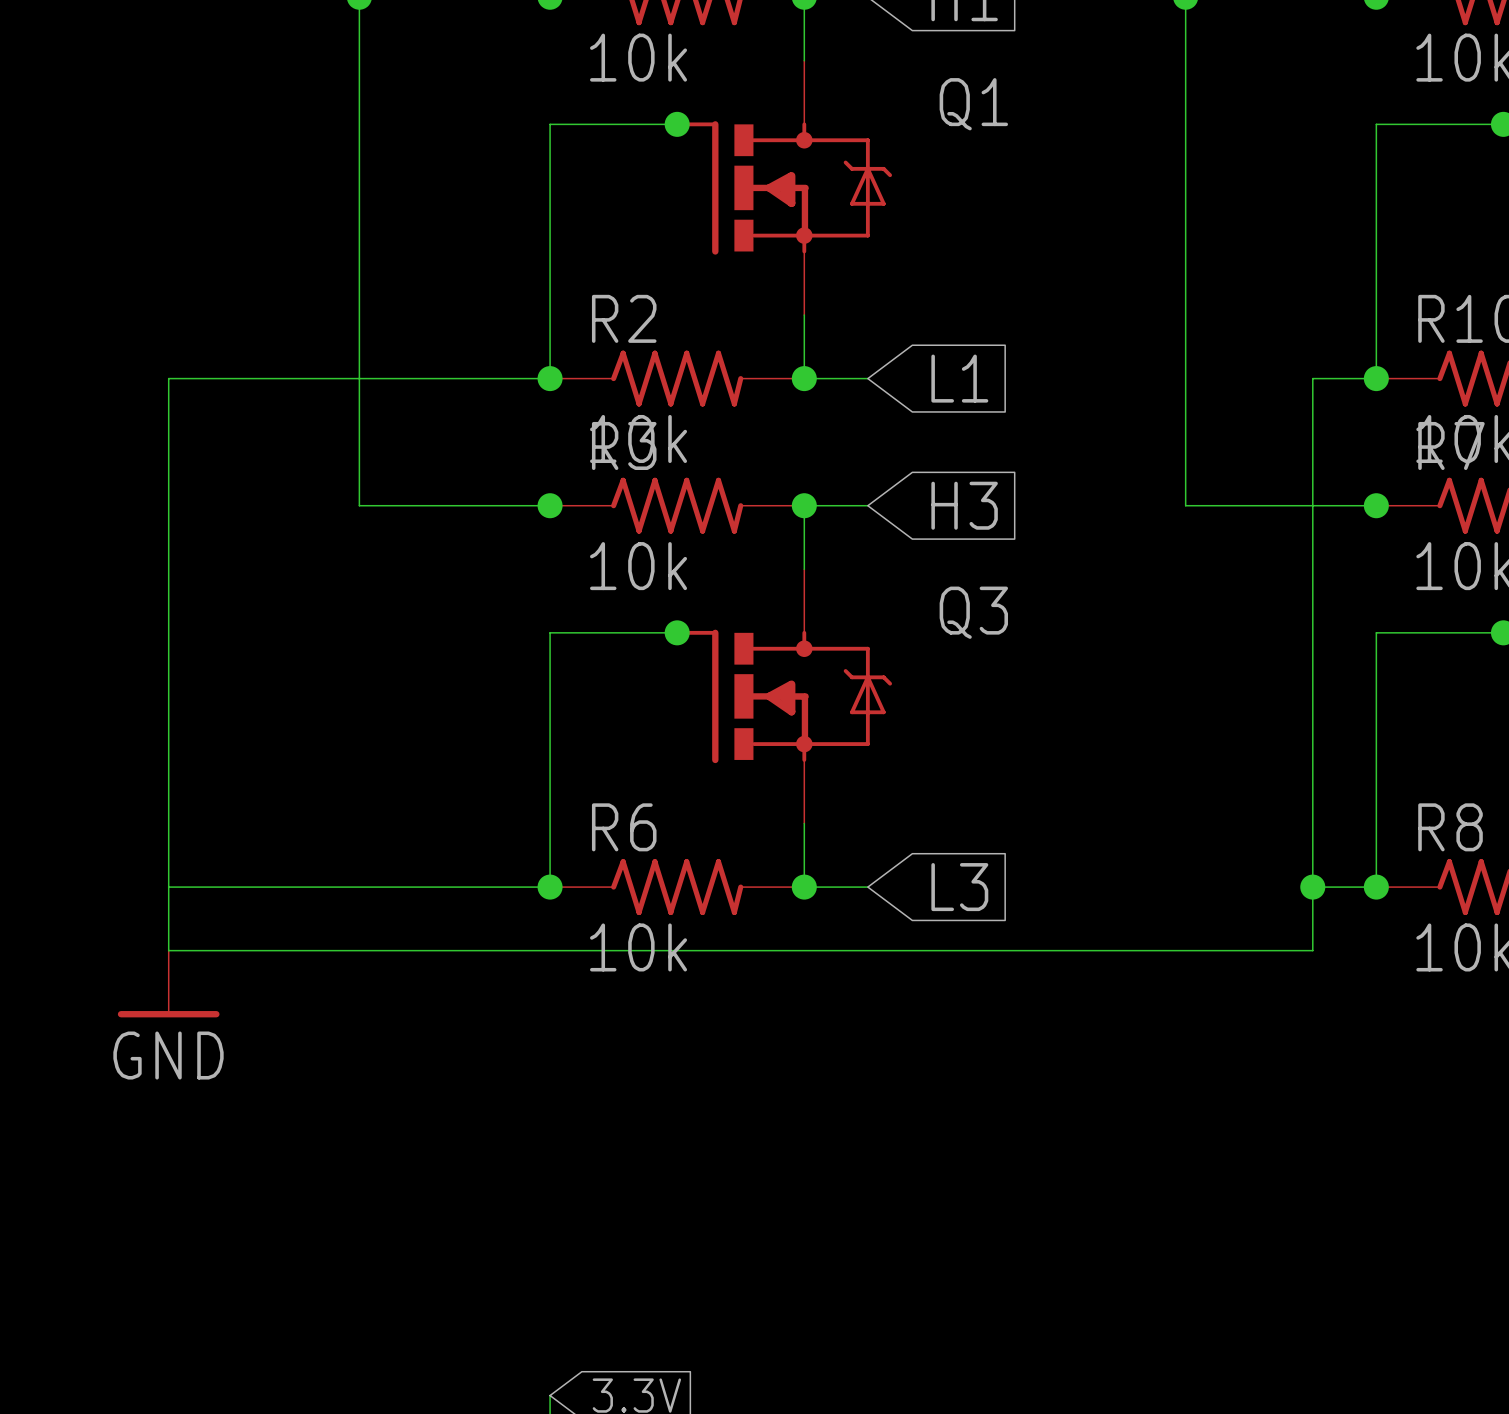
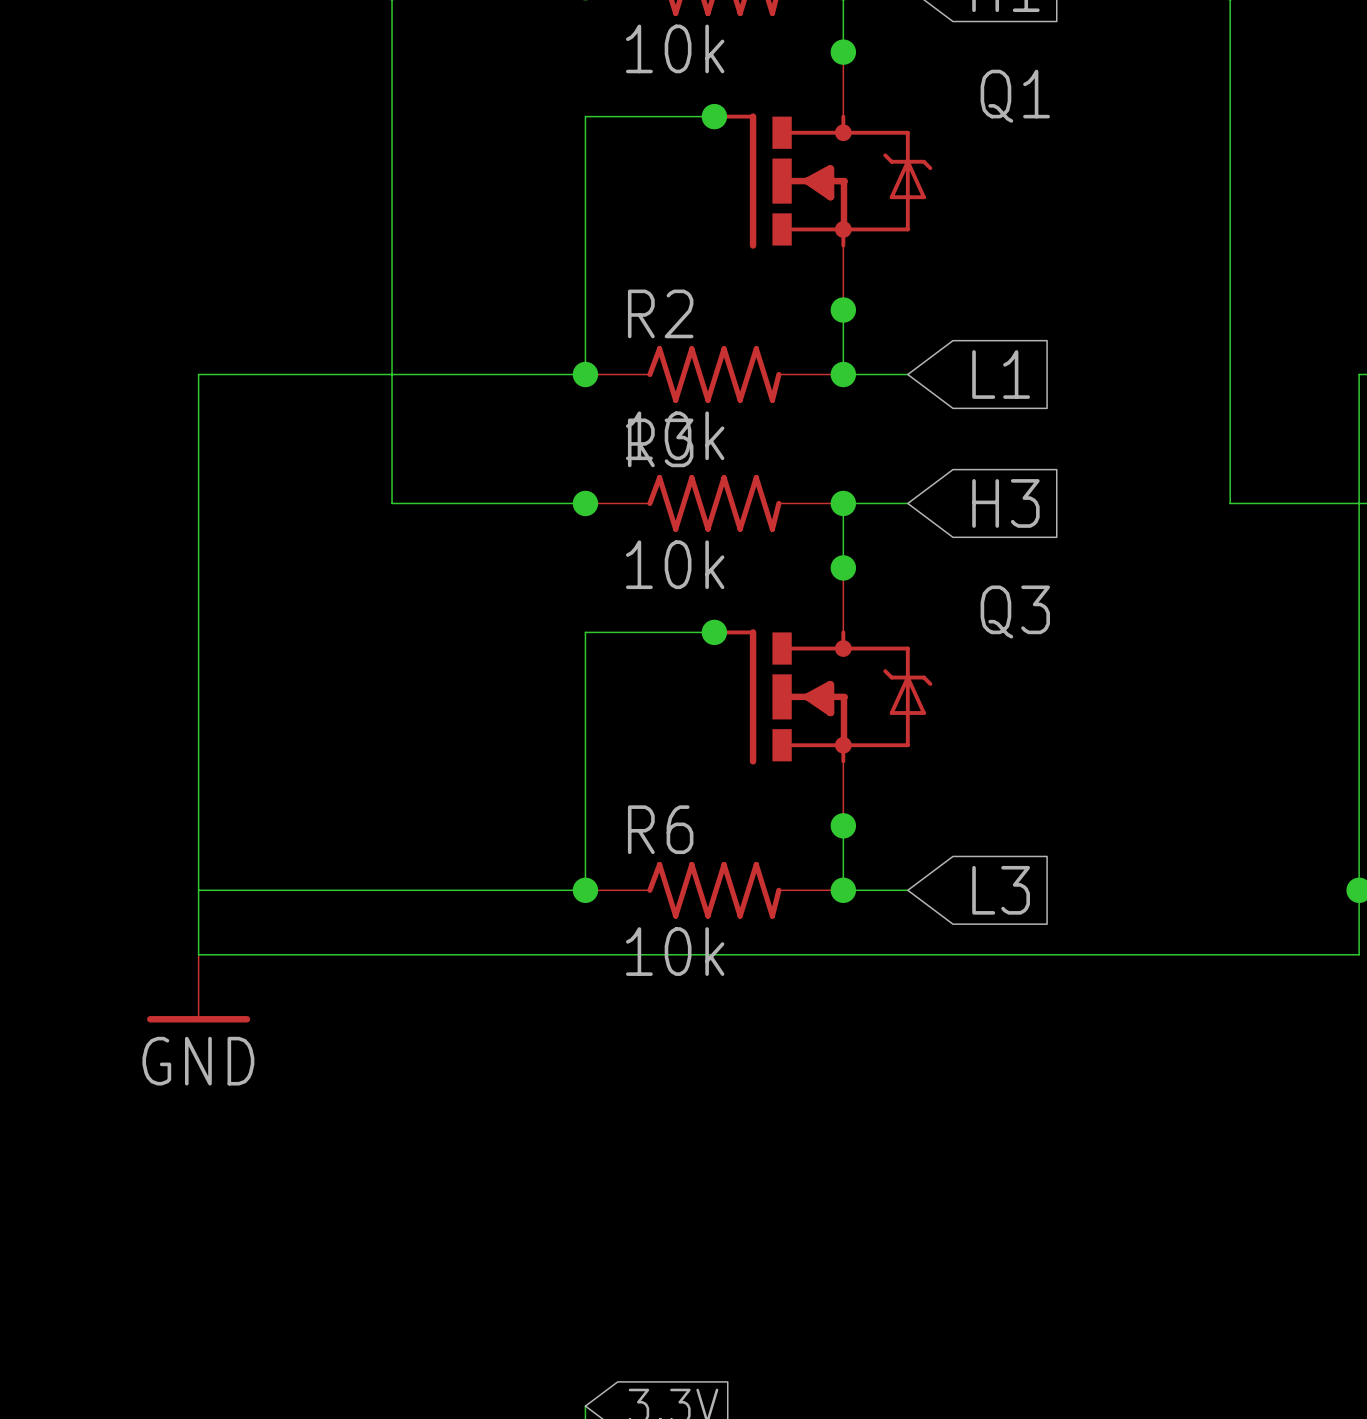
junction: none -> (843, 52)
junction: none -> (843, 310)
junction: none -> (843, 567)
junction: none -> (843, 825)

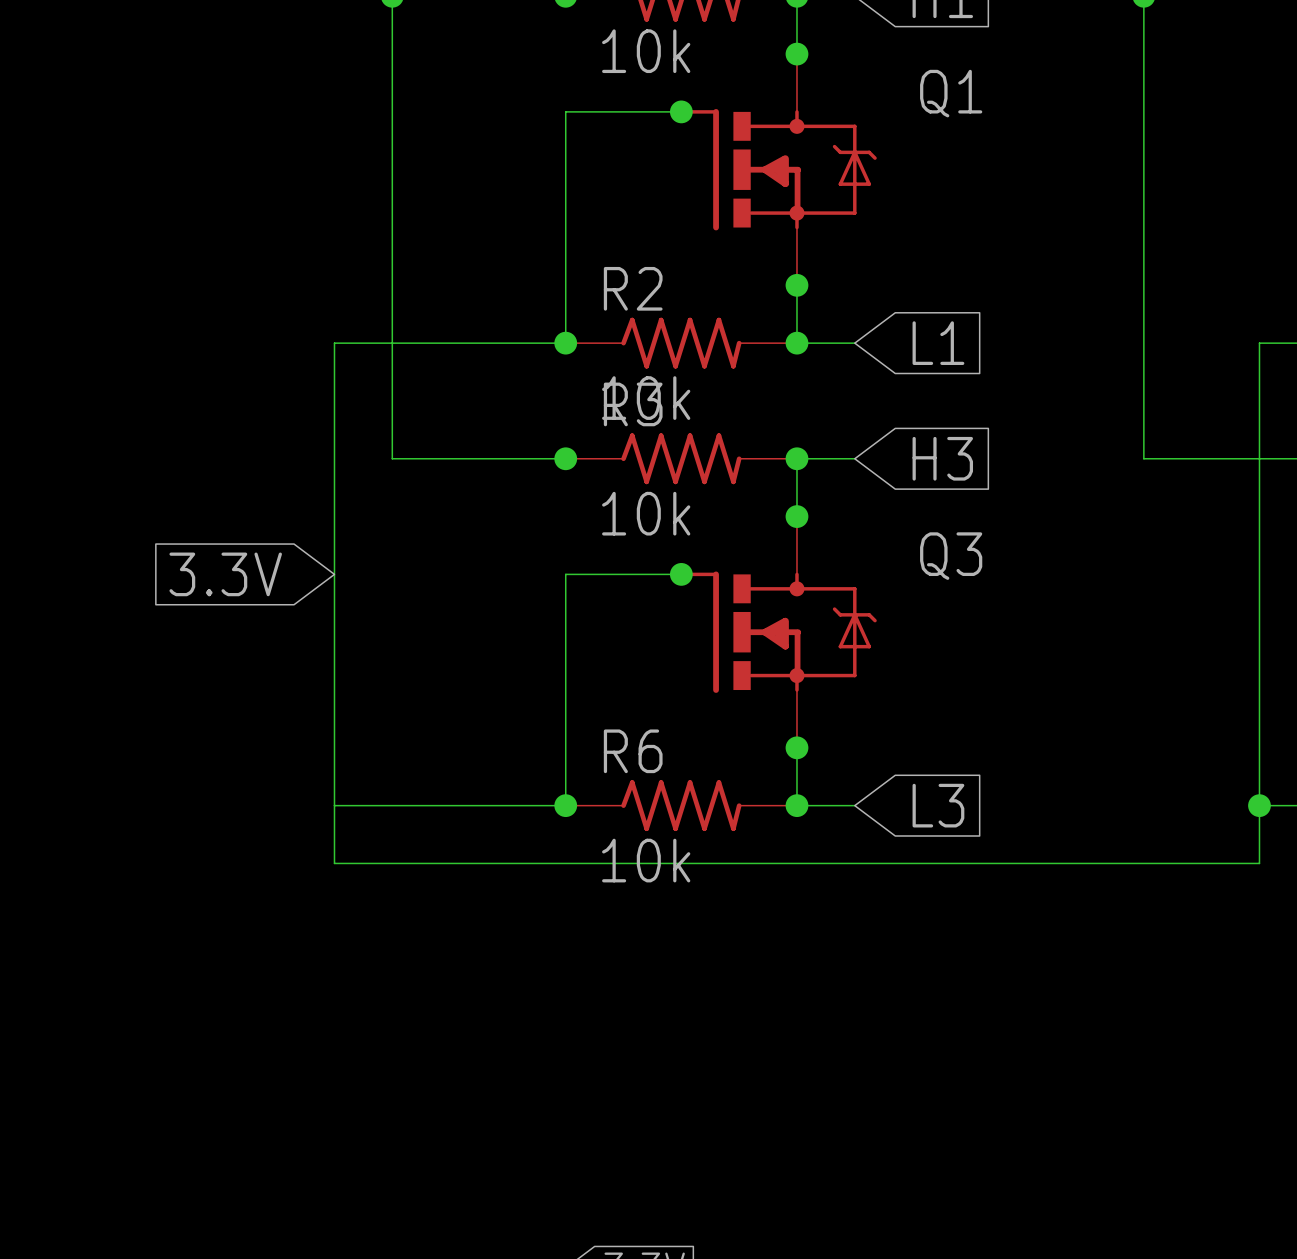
wire: (327, 374) (198, 374) (198, 954) (327, 954) -> (334, 343) (334, 863)
global label: none -> 3.3V (225, 574)
wire: (198, 890) (327, 890) -> none
power symbol: GND (198, 988) -> none

